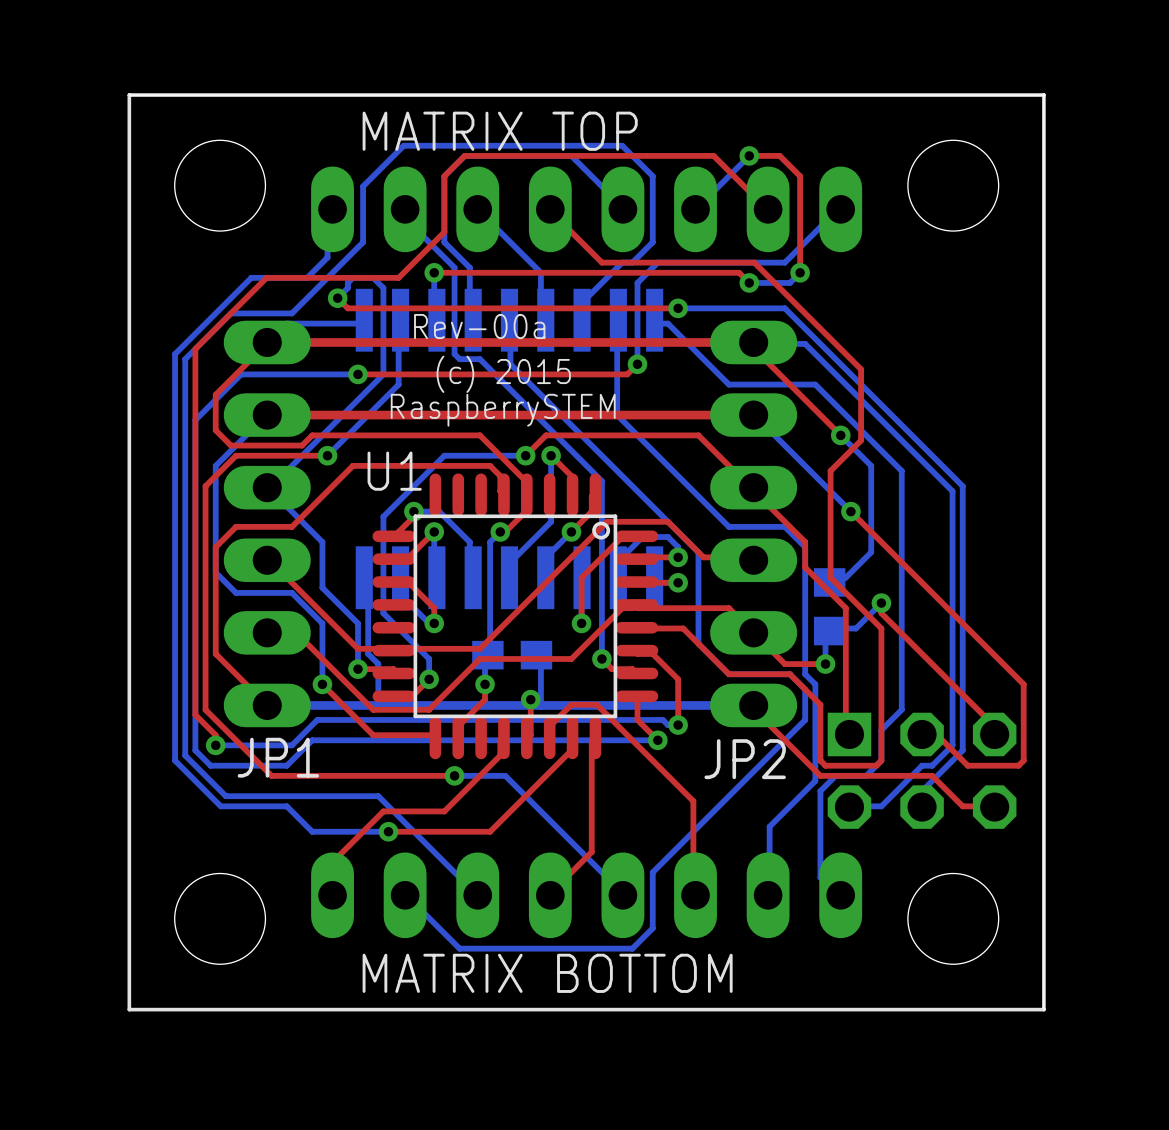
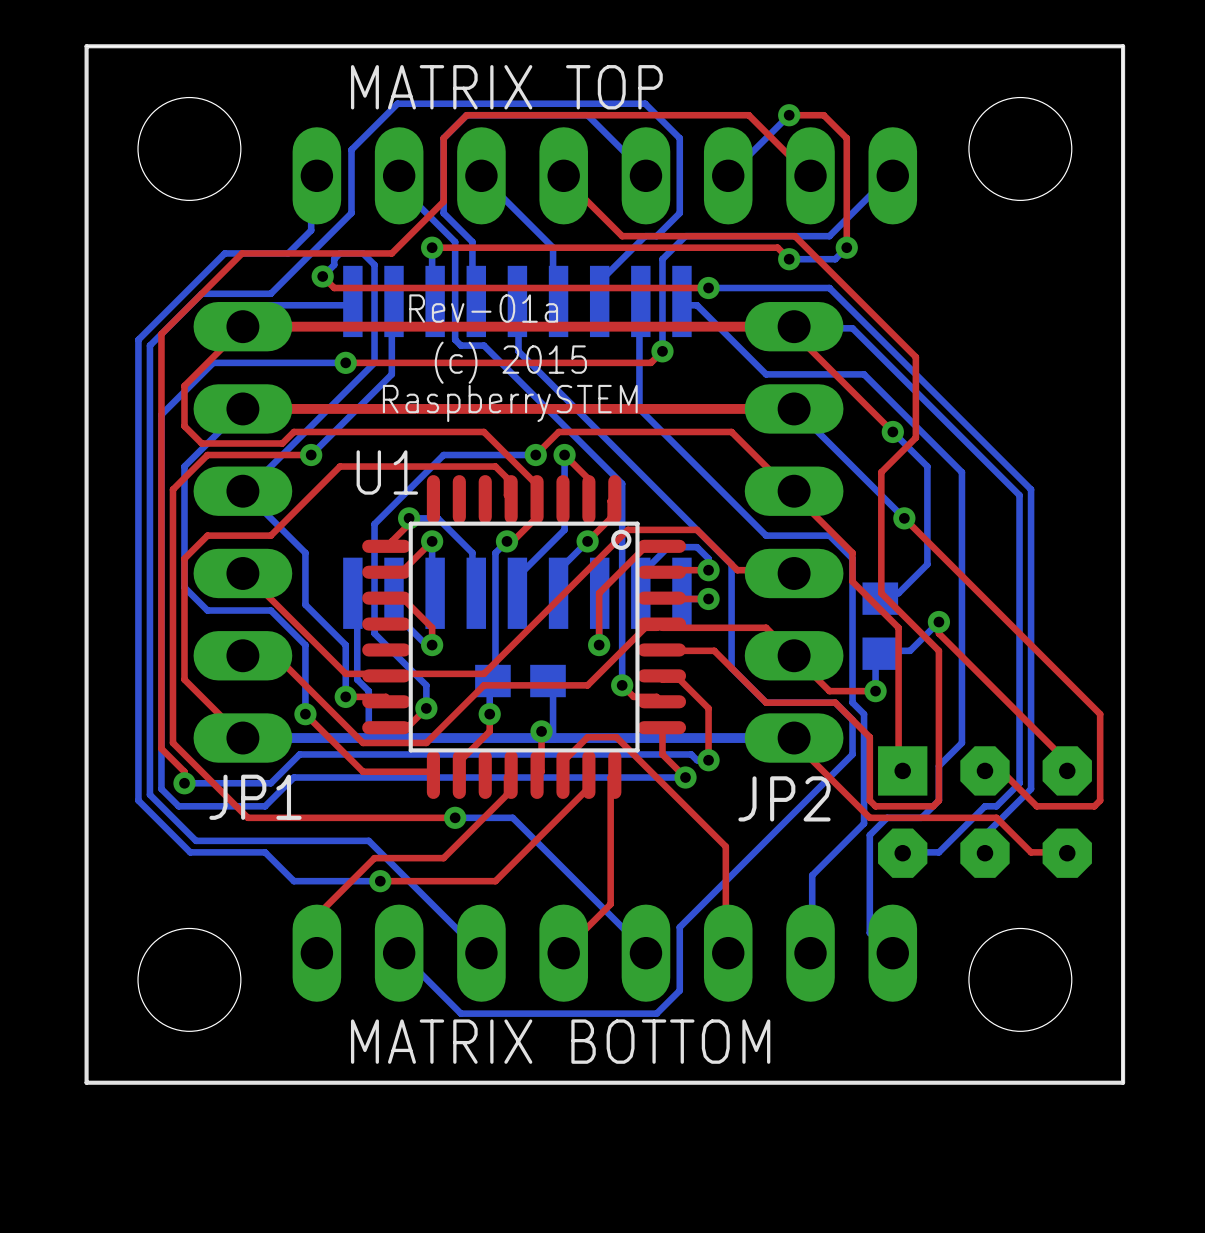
text: Rev-00a (479, 326) -> Rev-01a (483, 308)
part footprint: [827, 712, 1017, 829] -> [878, 746, 1092, 878]

